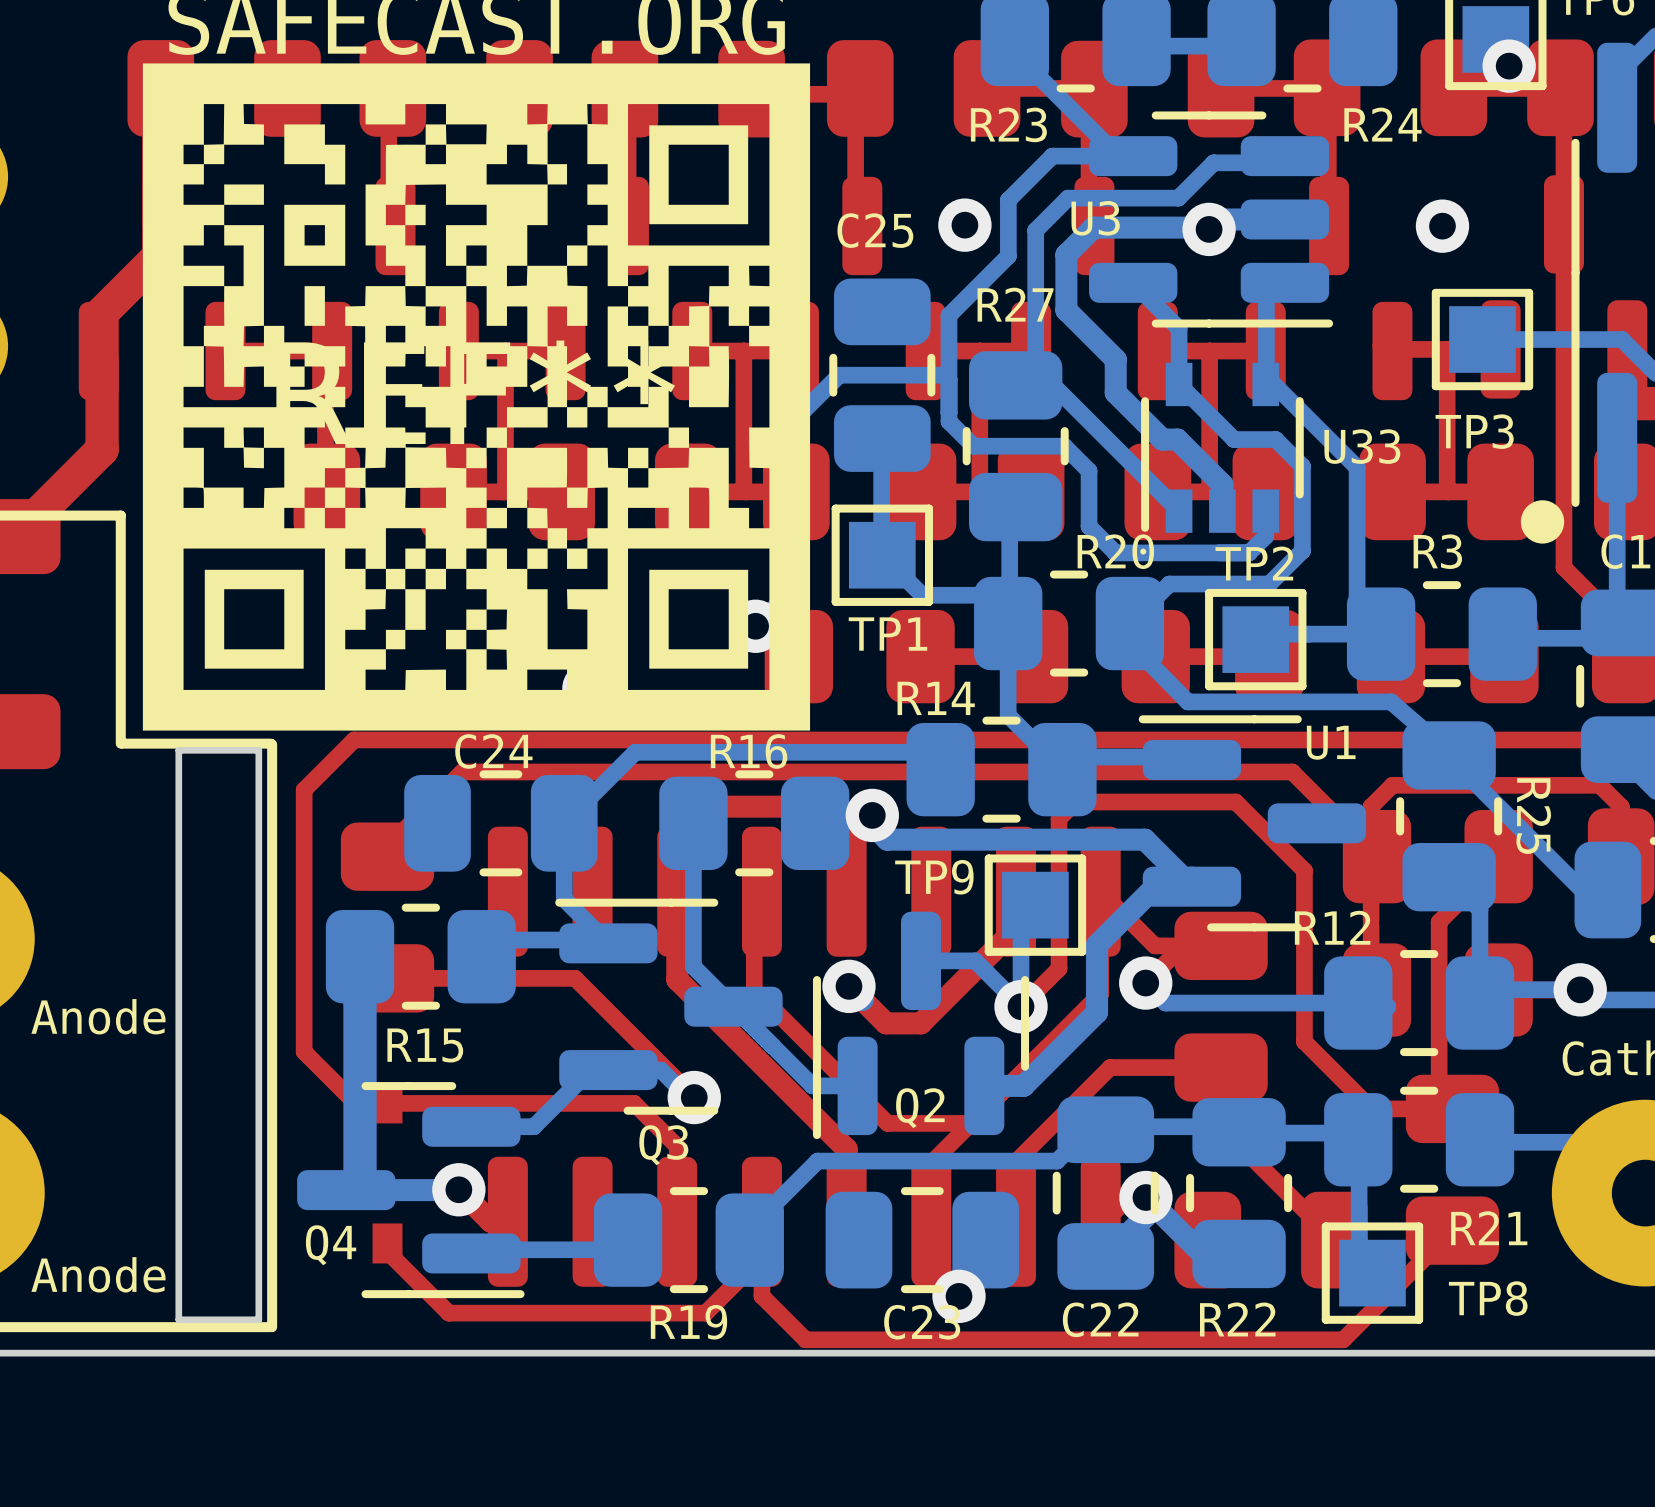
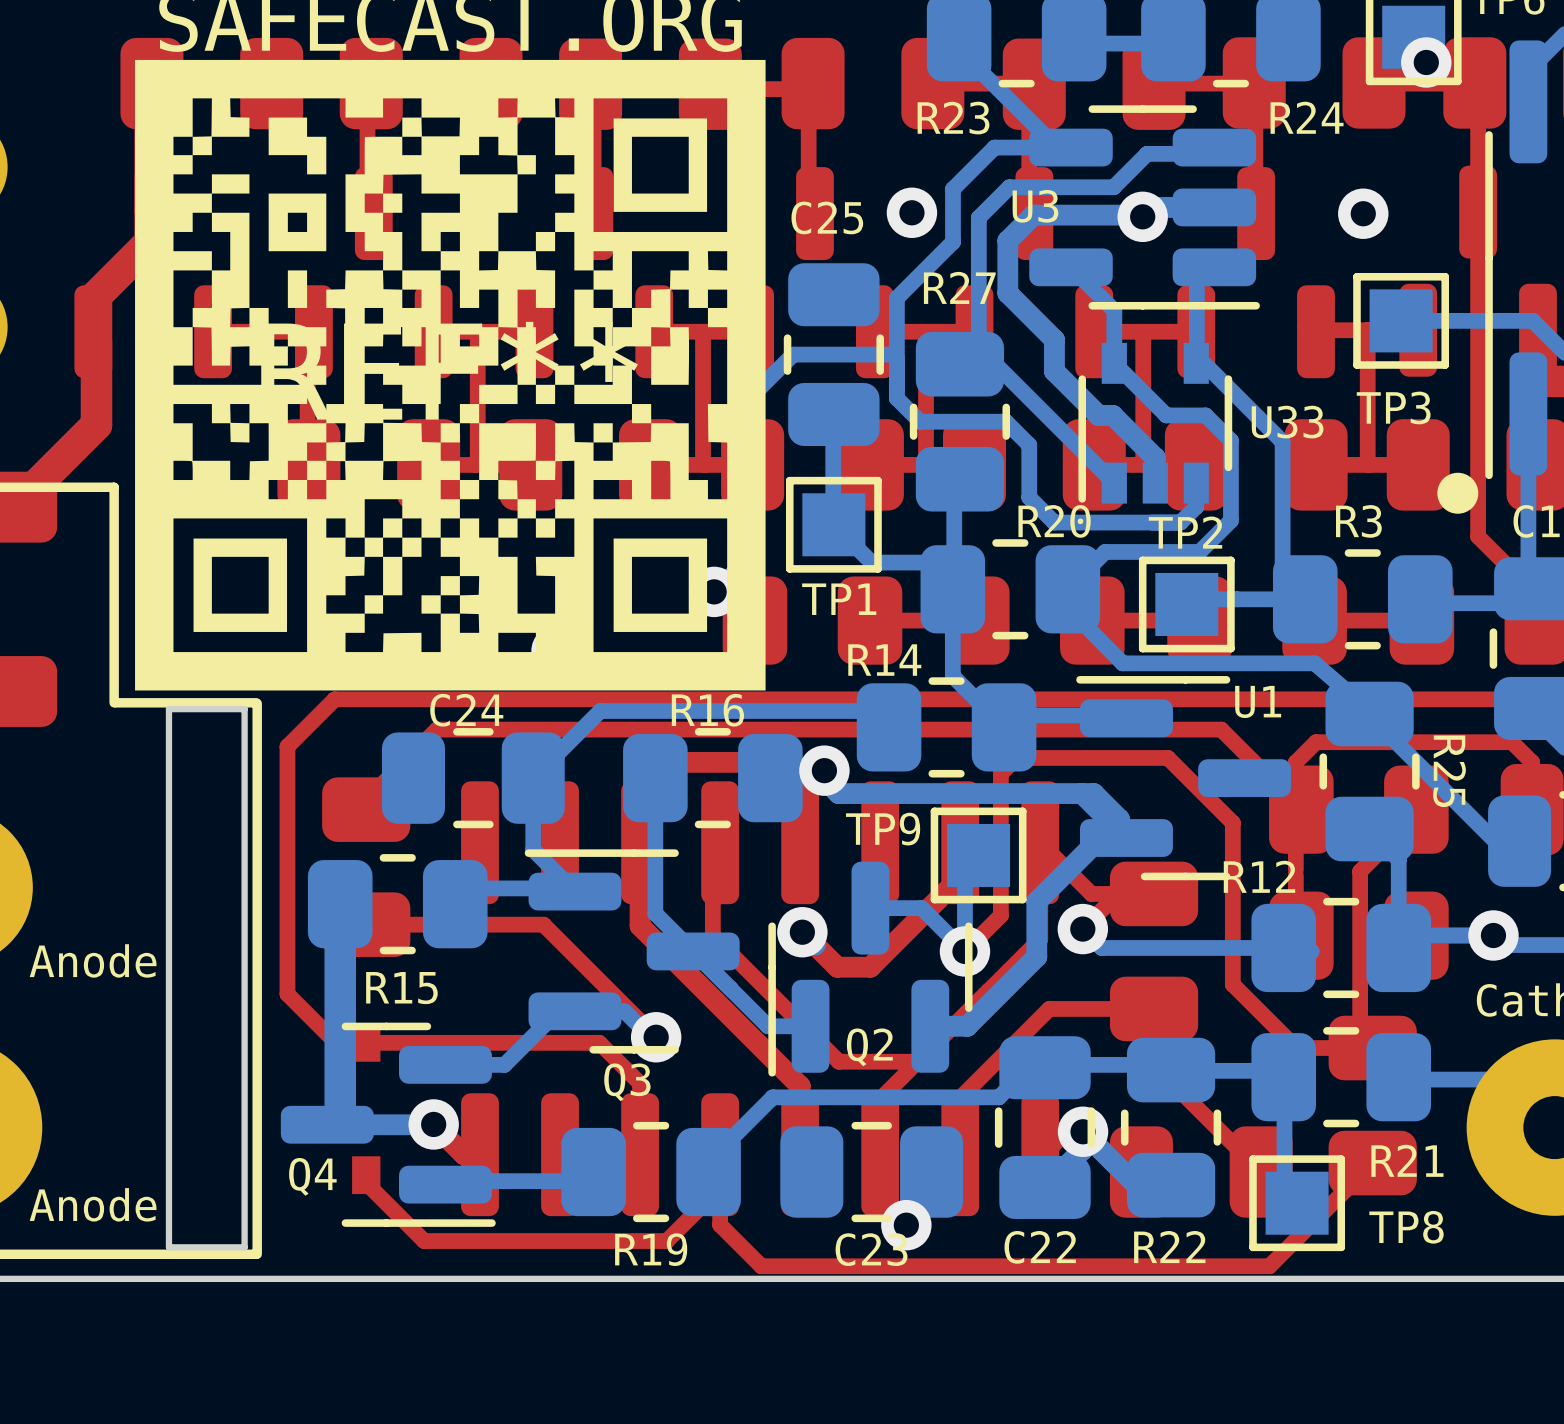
bottom track: (1191, 877) (1191, 886) (1155, 886) (1097, 945) (1097, 954) -> (1082, 793) (1093, 793) (1119, 819) (1036, 901)

